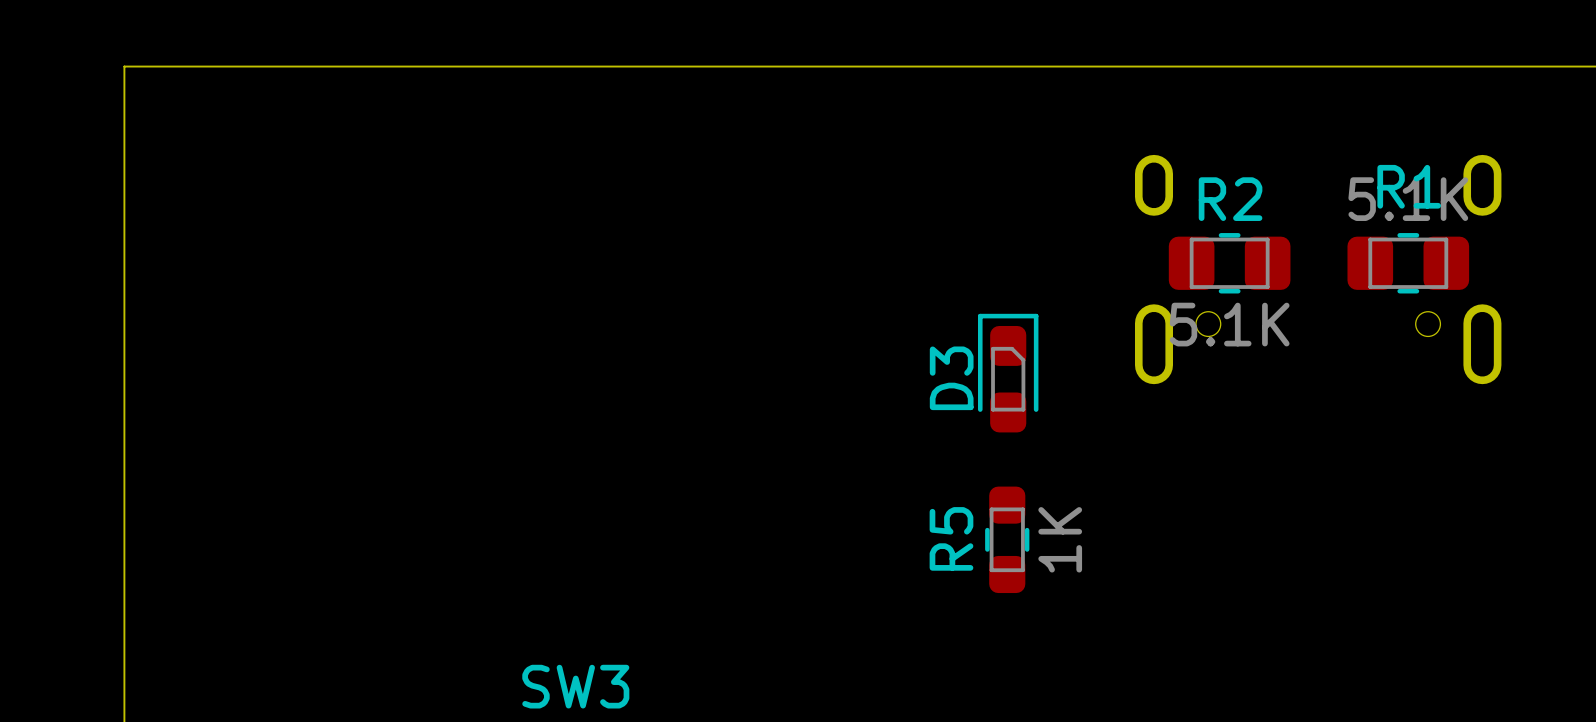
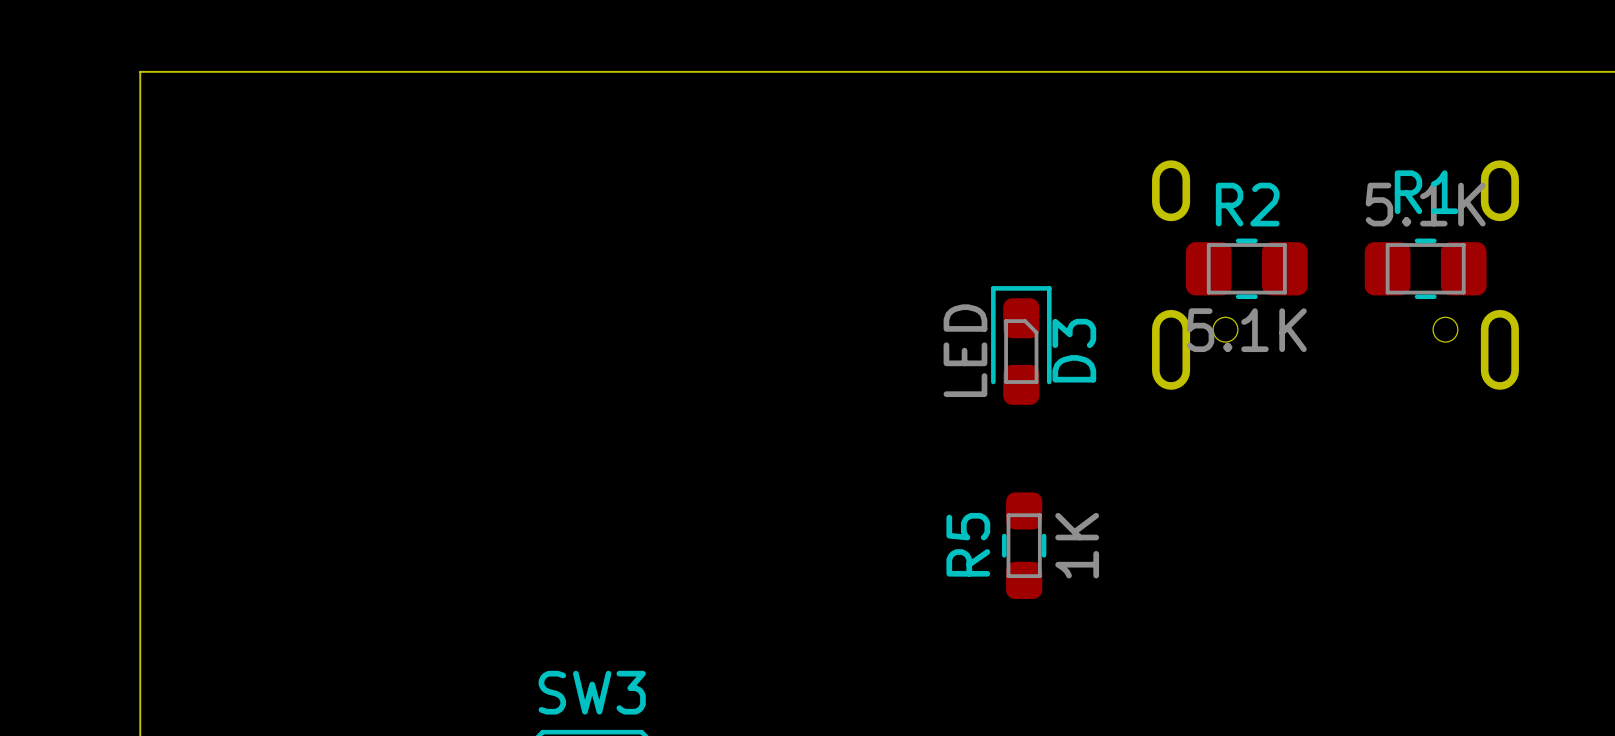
D3 value: none -> LED (965, 350)
D3 position: (1008, 373) -> (1021, 345)
D3 name position: D3 (951, 378) -> D3 (1074, 350)

